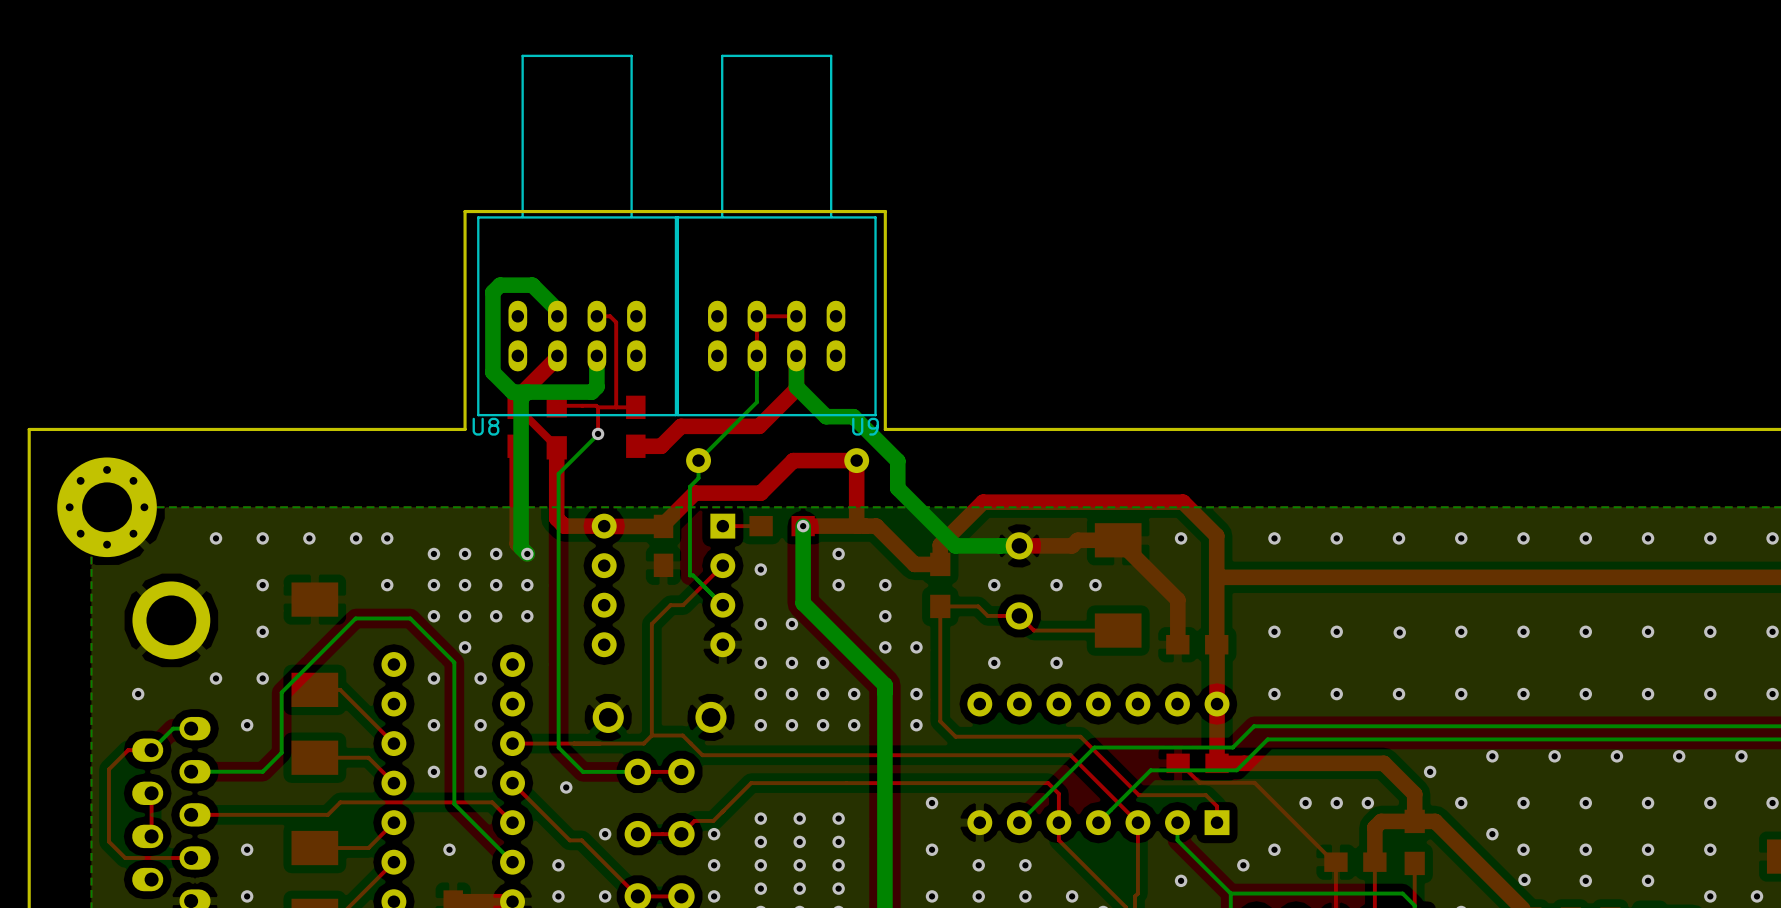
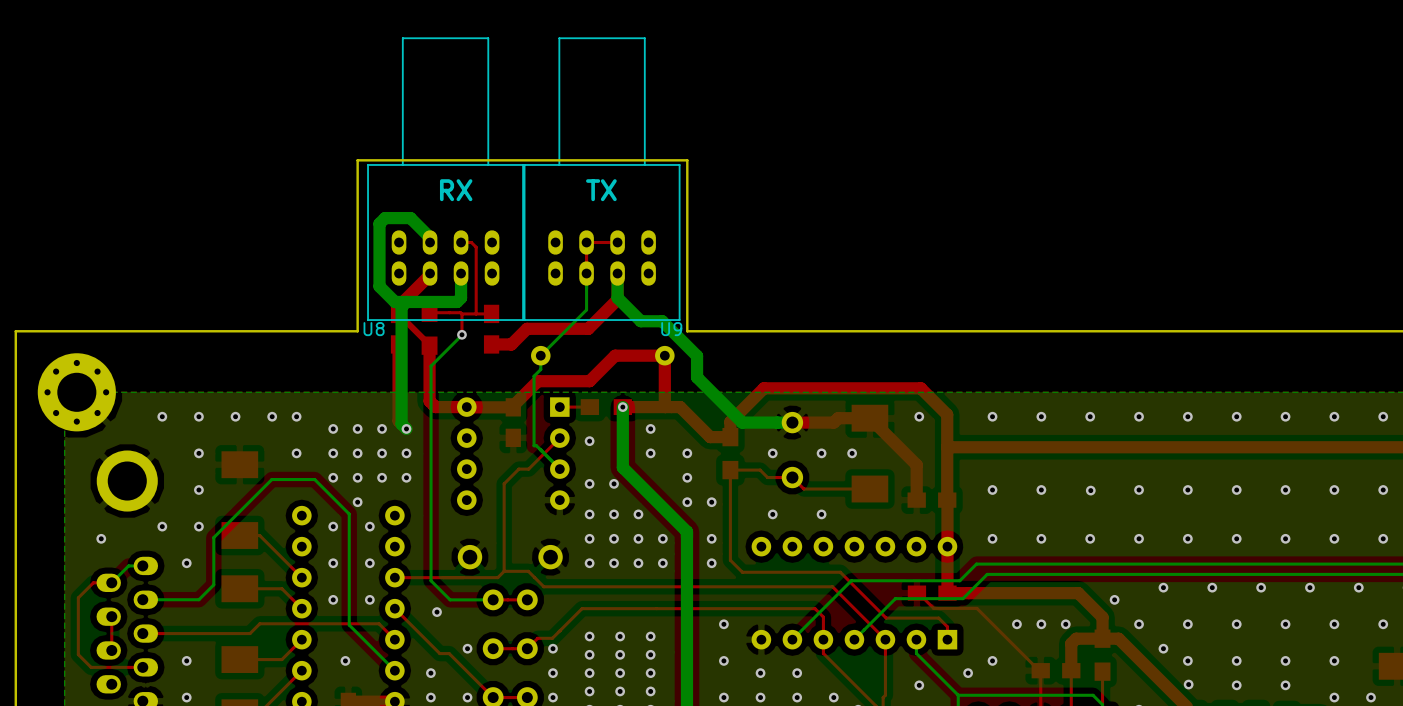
text: none -> RX (456, 190)
text: none -> TX (601, 190)

